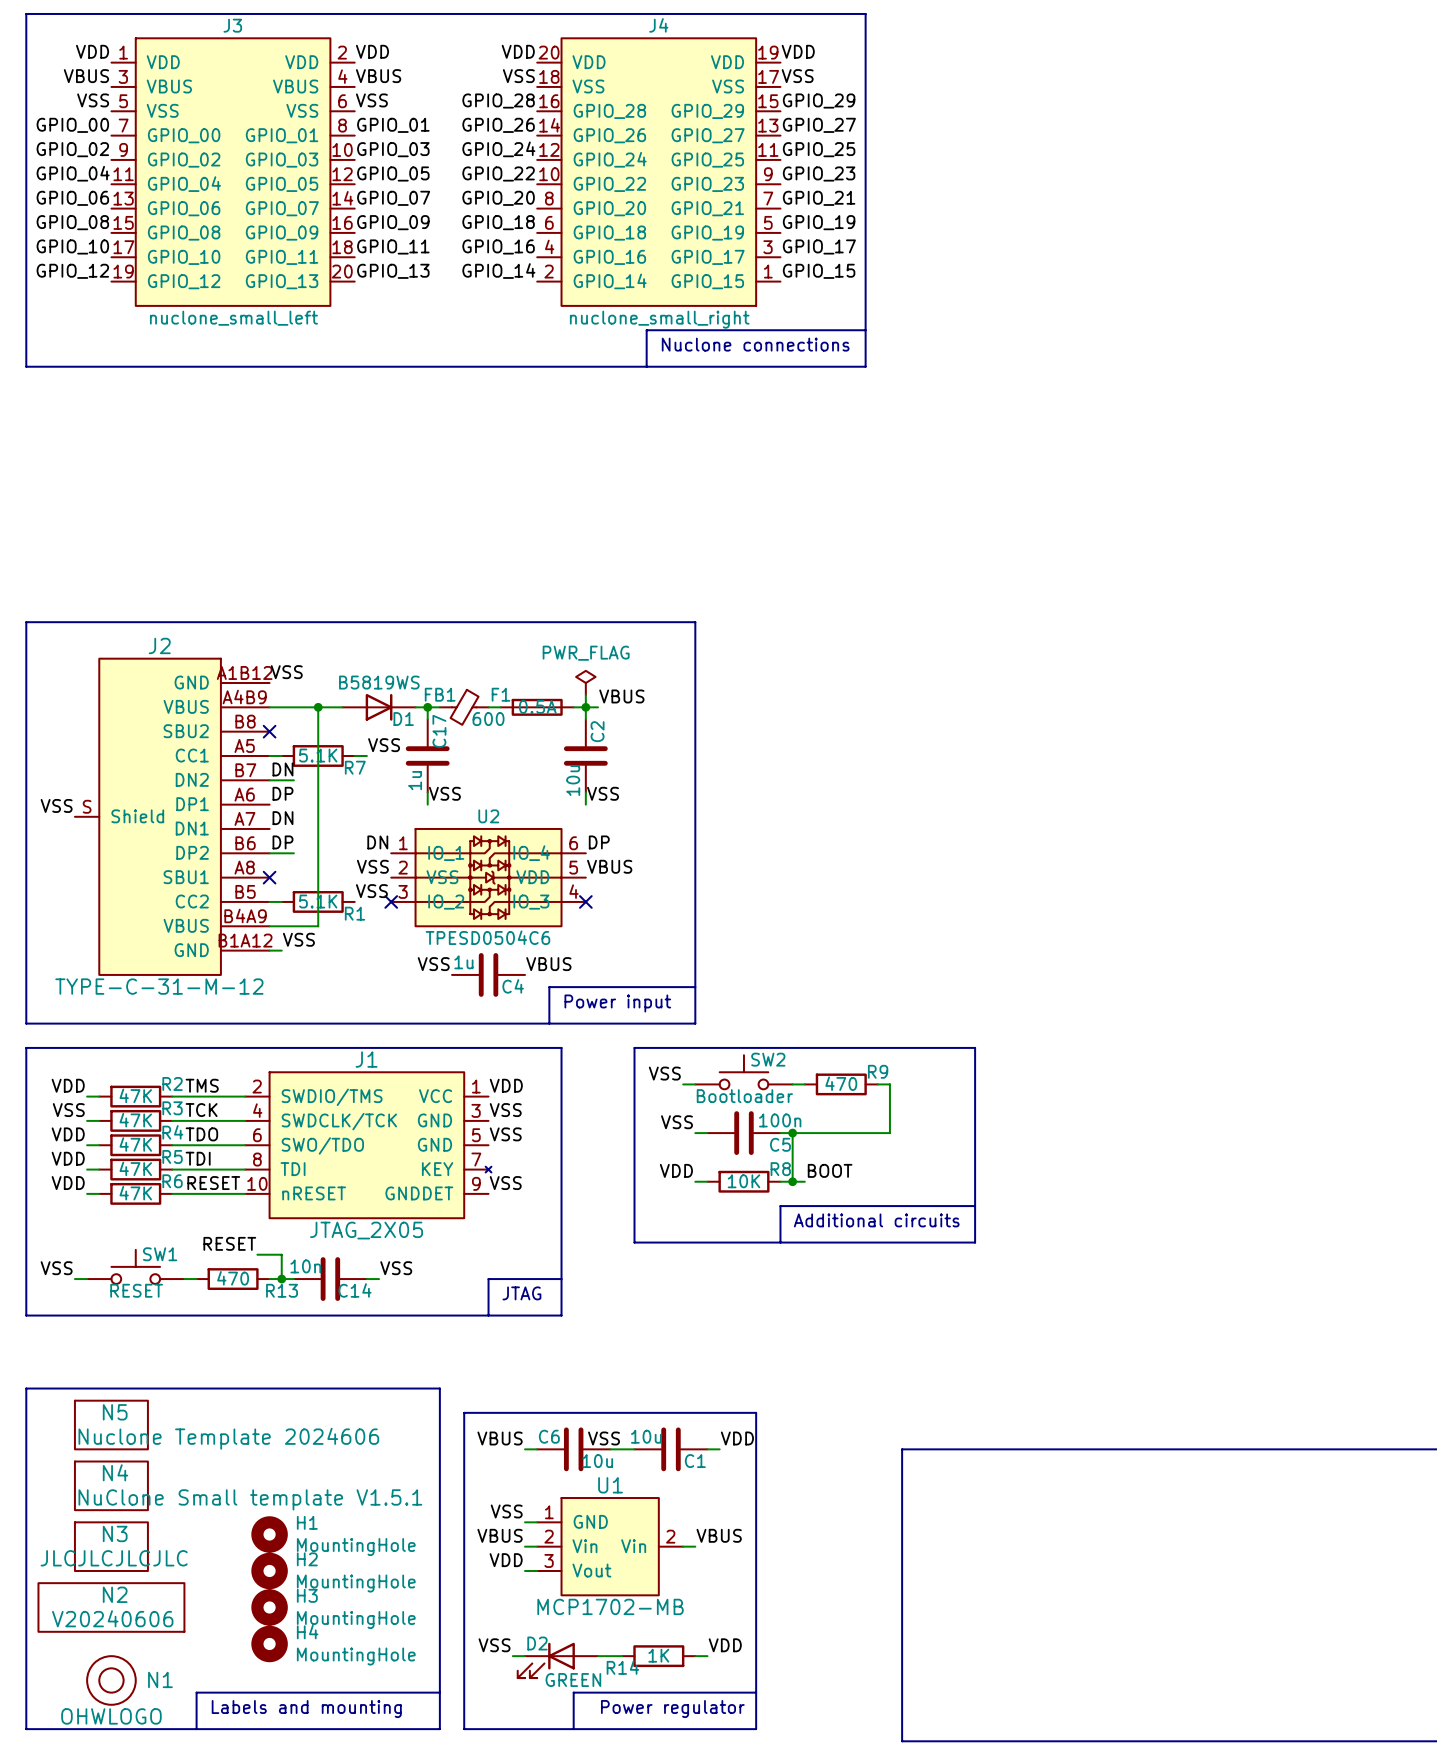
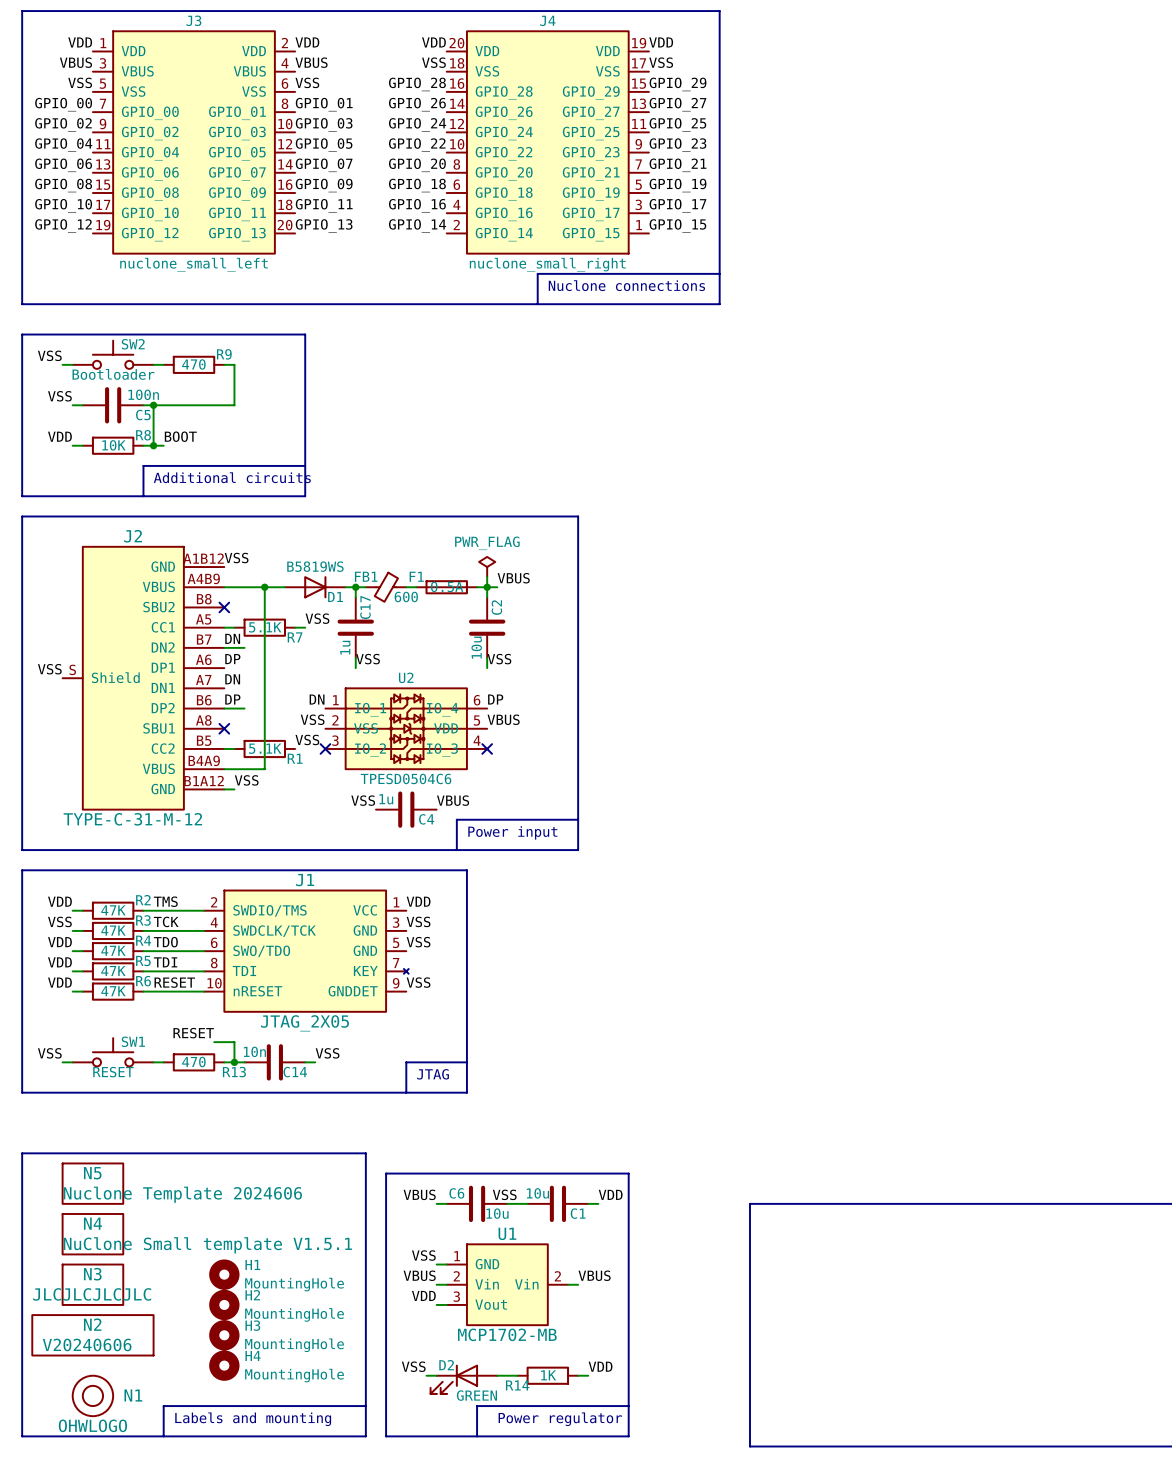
line: none -> (22, 334) (22, 496) (305, 496) (305, 334) (22, 334)
label: none -> VSS (49, 355)
wire: none -> (62, 364) (72, 364)
wire: none -> (153, 364) (163, 364)
wire: none -> (224, 364) (234, 364) (234, 405) (143, 405)
label: none -> VSS (59, 396)
wire: none -> (72, 405) (82, 405)
wire: none -> (153, 405) (153, 445)
junction: none -> (153, 405)
label: none -> VDD (59, 436)
label: none -> BOOT (180, 436)
wire: none -> (72, 445) (82, 445)
wire: none -> (143, 445) (163, 445)
junction: none -> (153, 445)
line: none -> (305, 465) (143, 465) (143, 496)
text: none -> Additional circuits (232, 477)
line: (634, 1047) (634, 1242) (975, 1242) (975, 1047) (634, 1047) -> none
SW2 position: (743, 1072) -> (113, 354)
label: VSS (664, 1073) -> none
wire: (683, 1084) (695, 1084) -> none
wire: (792, 1084) (804, 1084) -> none
R9 position: (841, 1084) -> (194, 364)
wire: (877, 1084) (889, 1084) (889, 1133) (780, 1133) -> none
label: VSS (676, 1122) -> none
wire: (695, 1133) (707, 1133) -> none
C5 position: (743, 1133) -> (113, 405)
wire: (792, 1133) (792, 1181) -> none
junction: (792, 1133) -> none
label: VDD (676, 1170) -> none
label: BOOT (830, 1170) -> none
wire: (695, 1181) (707, 1181) -> none
R8 position: (743, 1181) -> (113, 445)
wire: (780, 1181) (804, 1181) -> none
junction: (792, 1181) -> none
line: (975, 1206) (780, 1206) (780, 1242) -> none
text: Additional circuits (876, 1220) -> none

